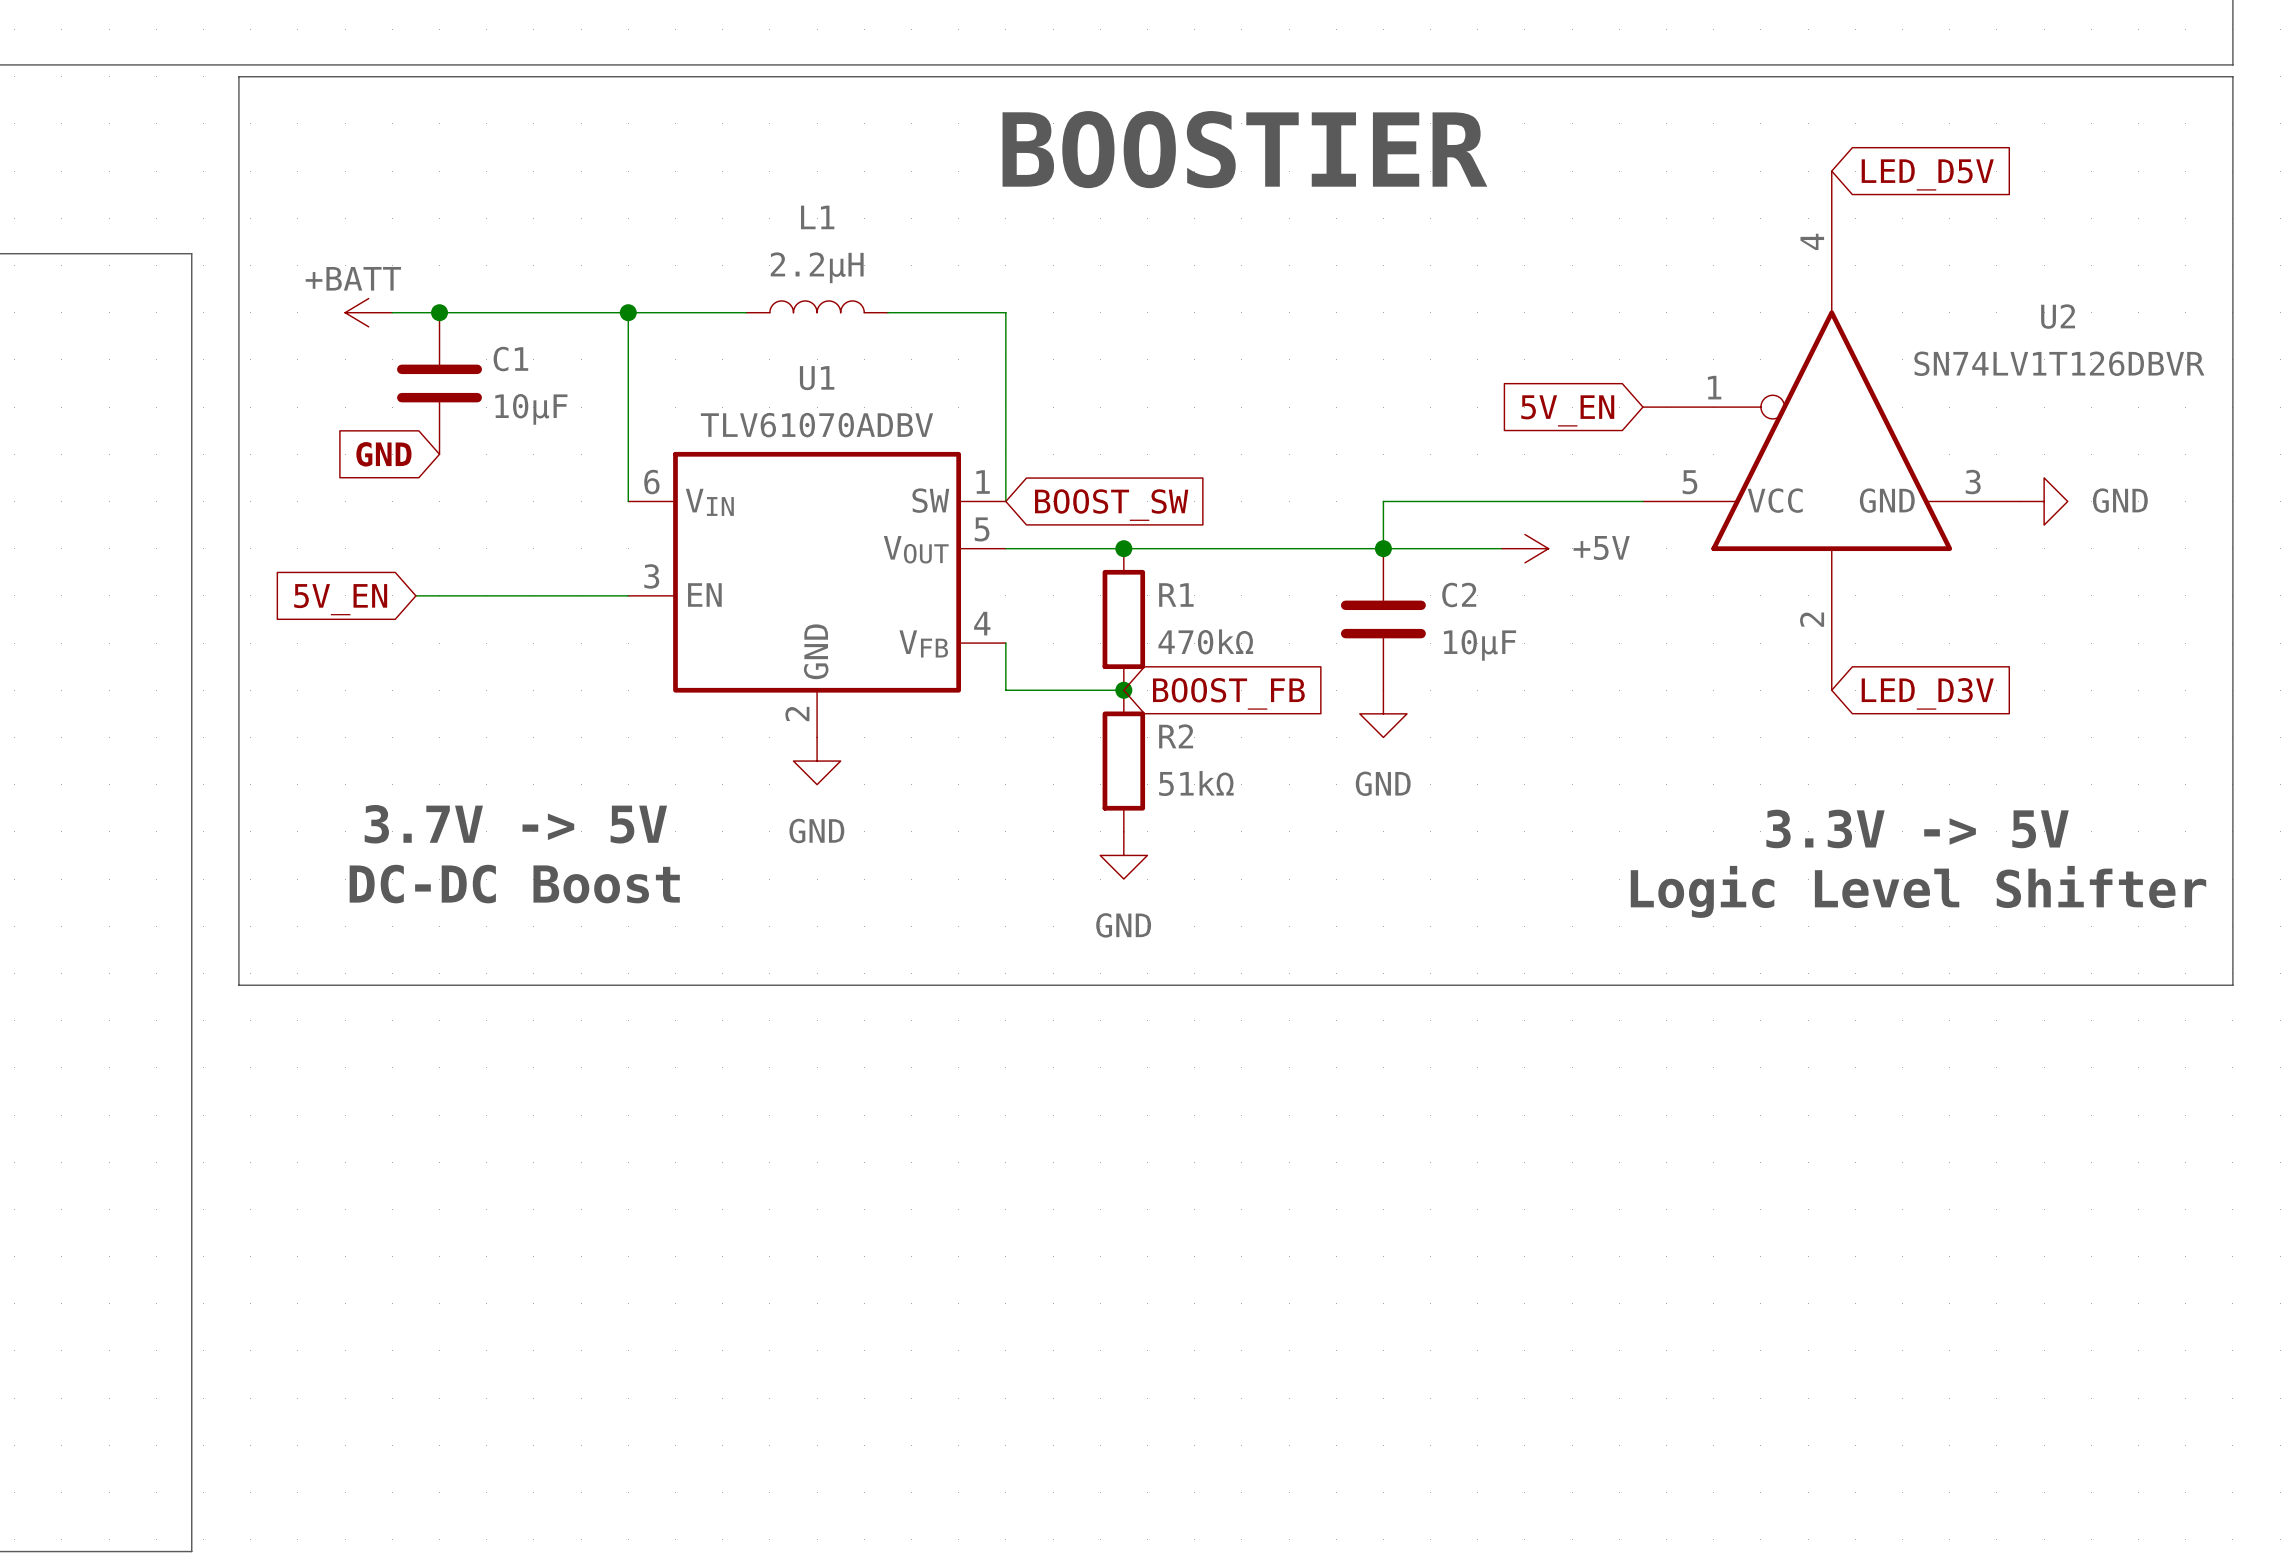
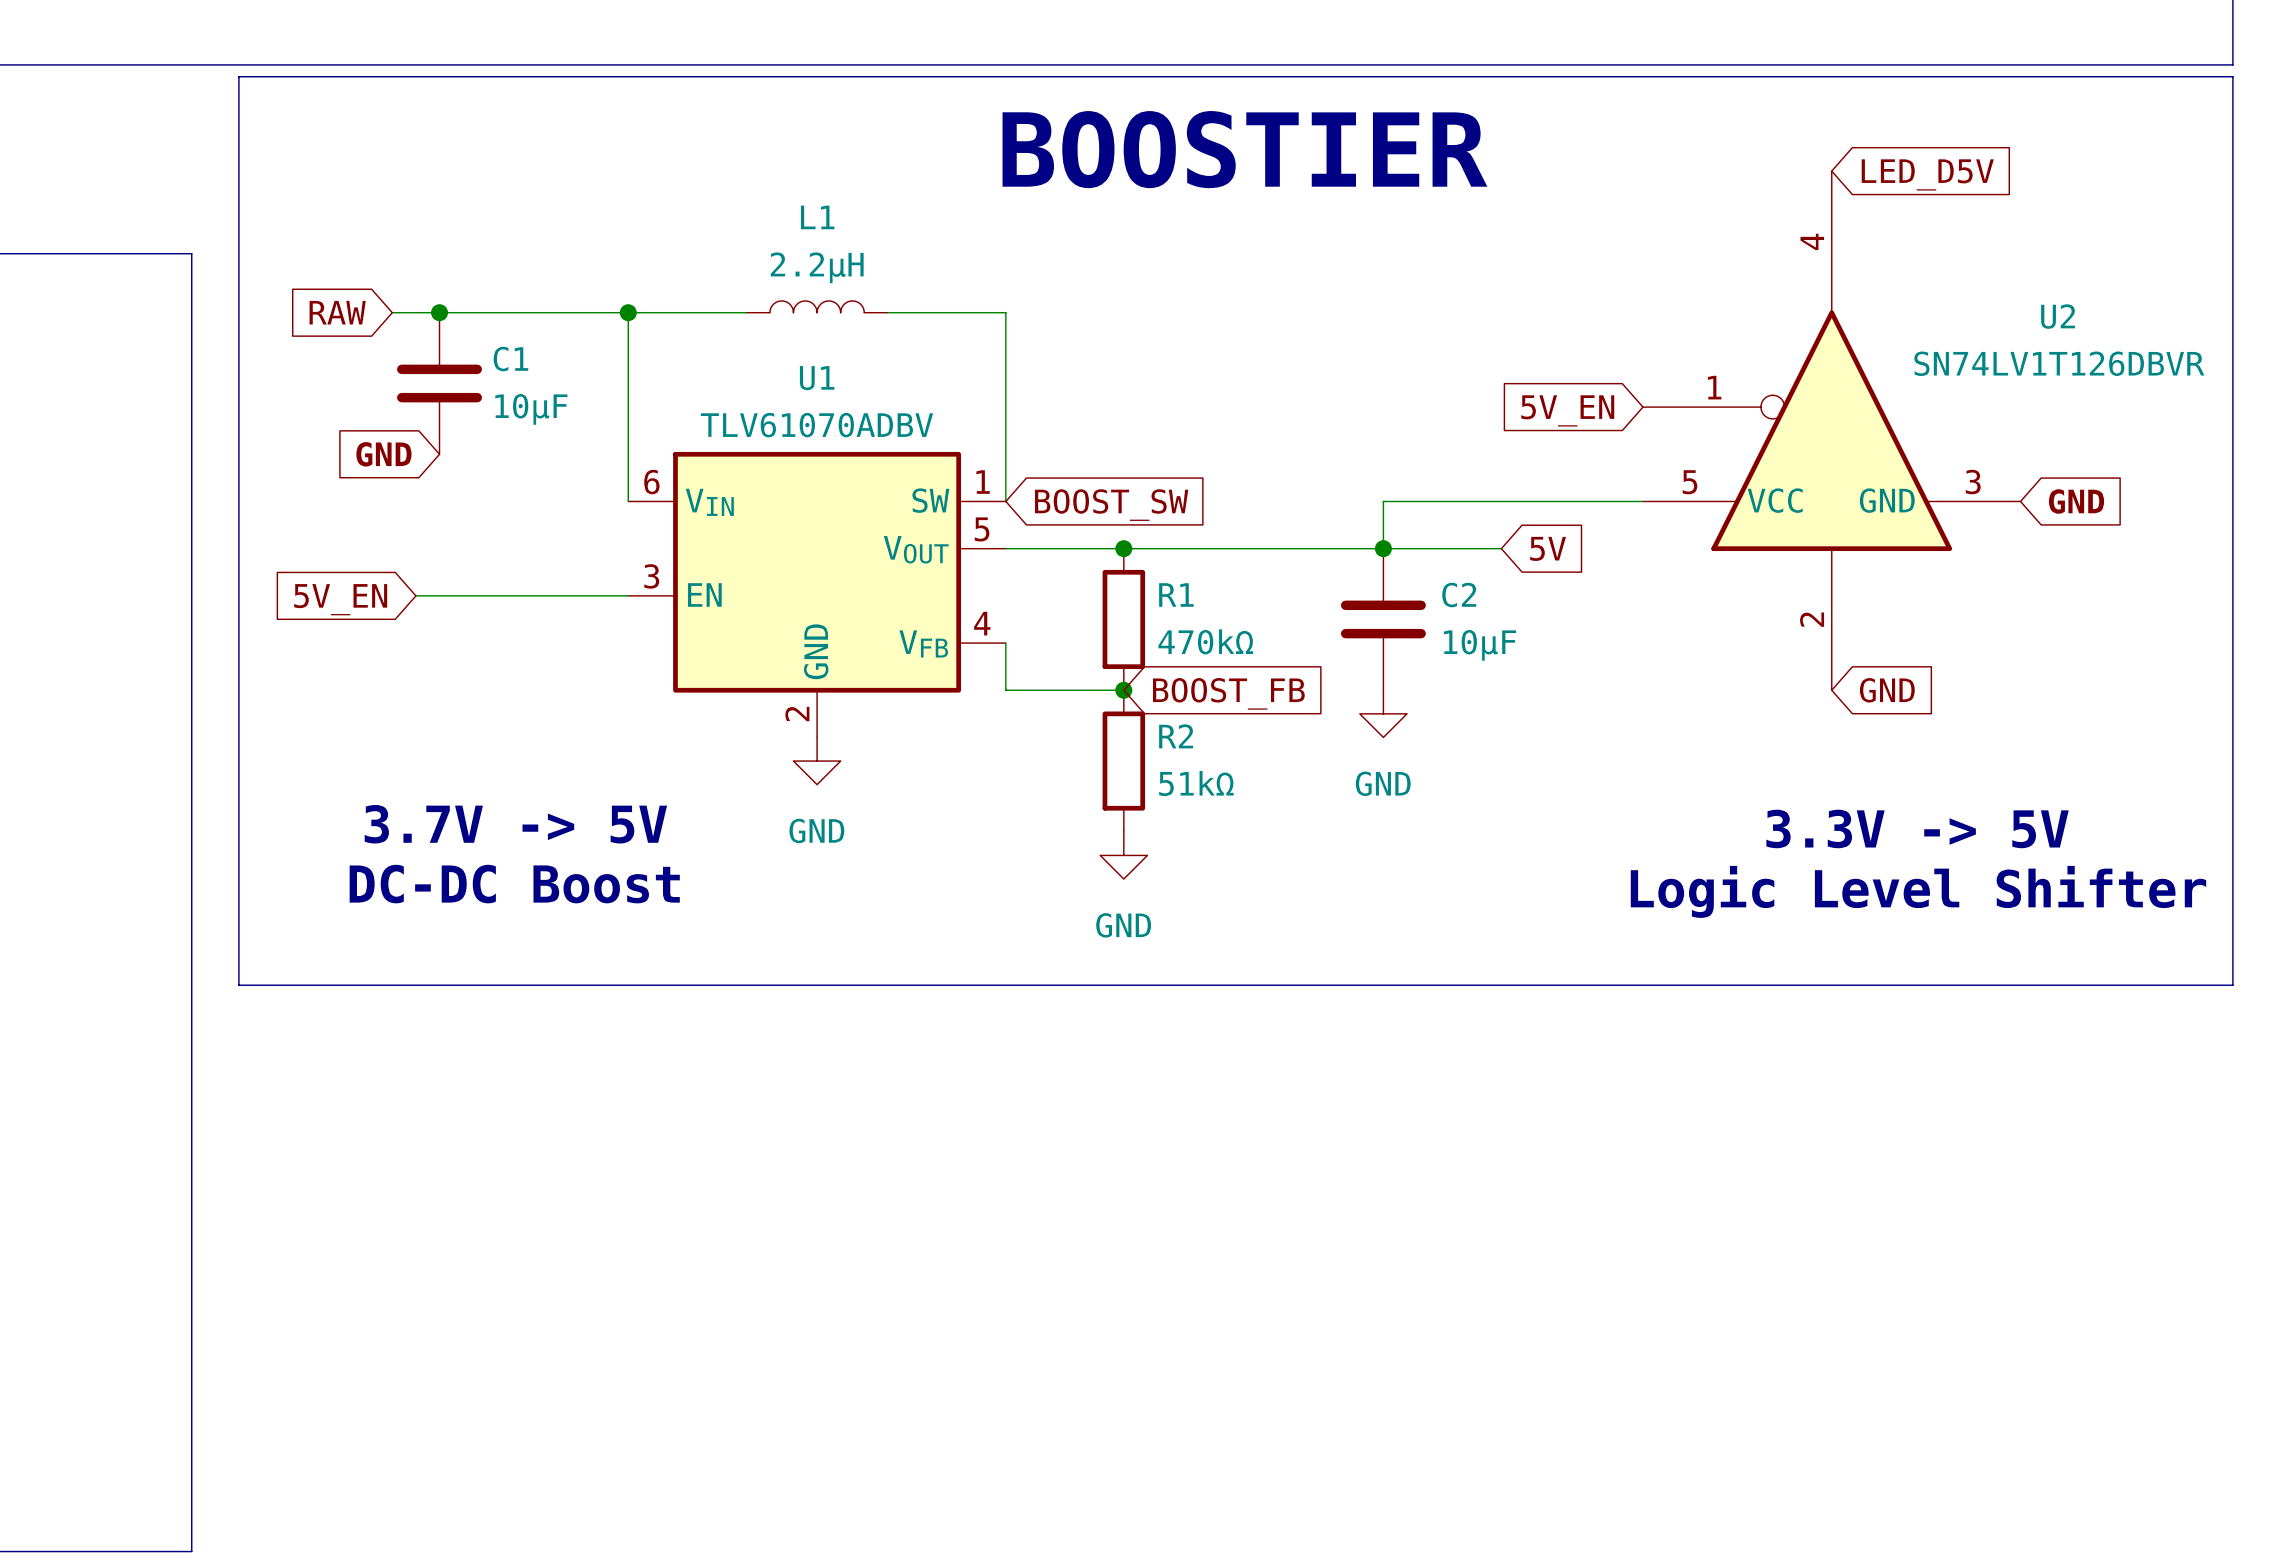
global label: none -> RAW (337, 312)
power symbol: +BATT (368, 312) -> none
power symbol: GND (2044, 501) -> none
global label: none -> GND (2076, 501)
power symbol: +5V (1524, 548) -> none
global label: none -> 5V (1548, 548)
global label: LED_D3V (1927, 693) -> GND (1887, 690)

